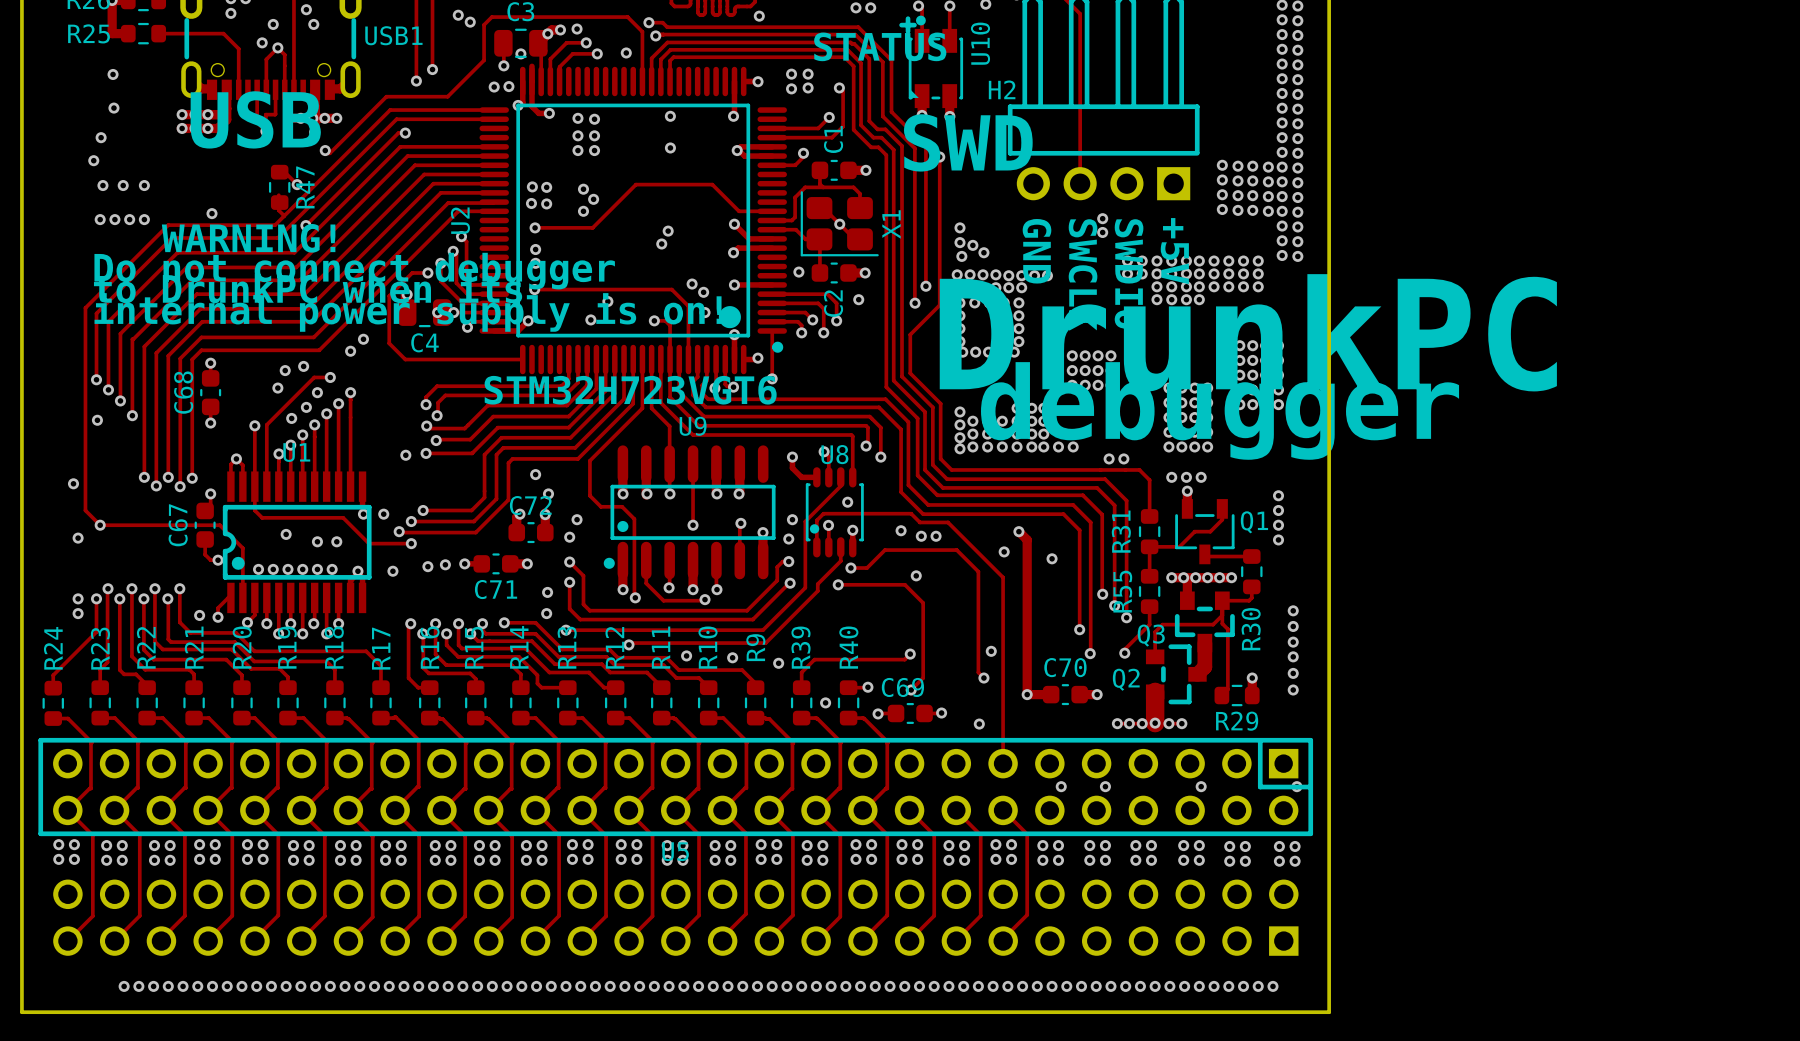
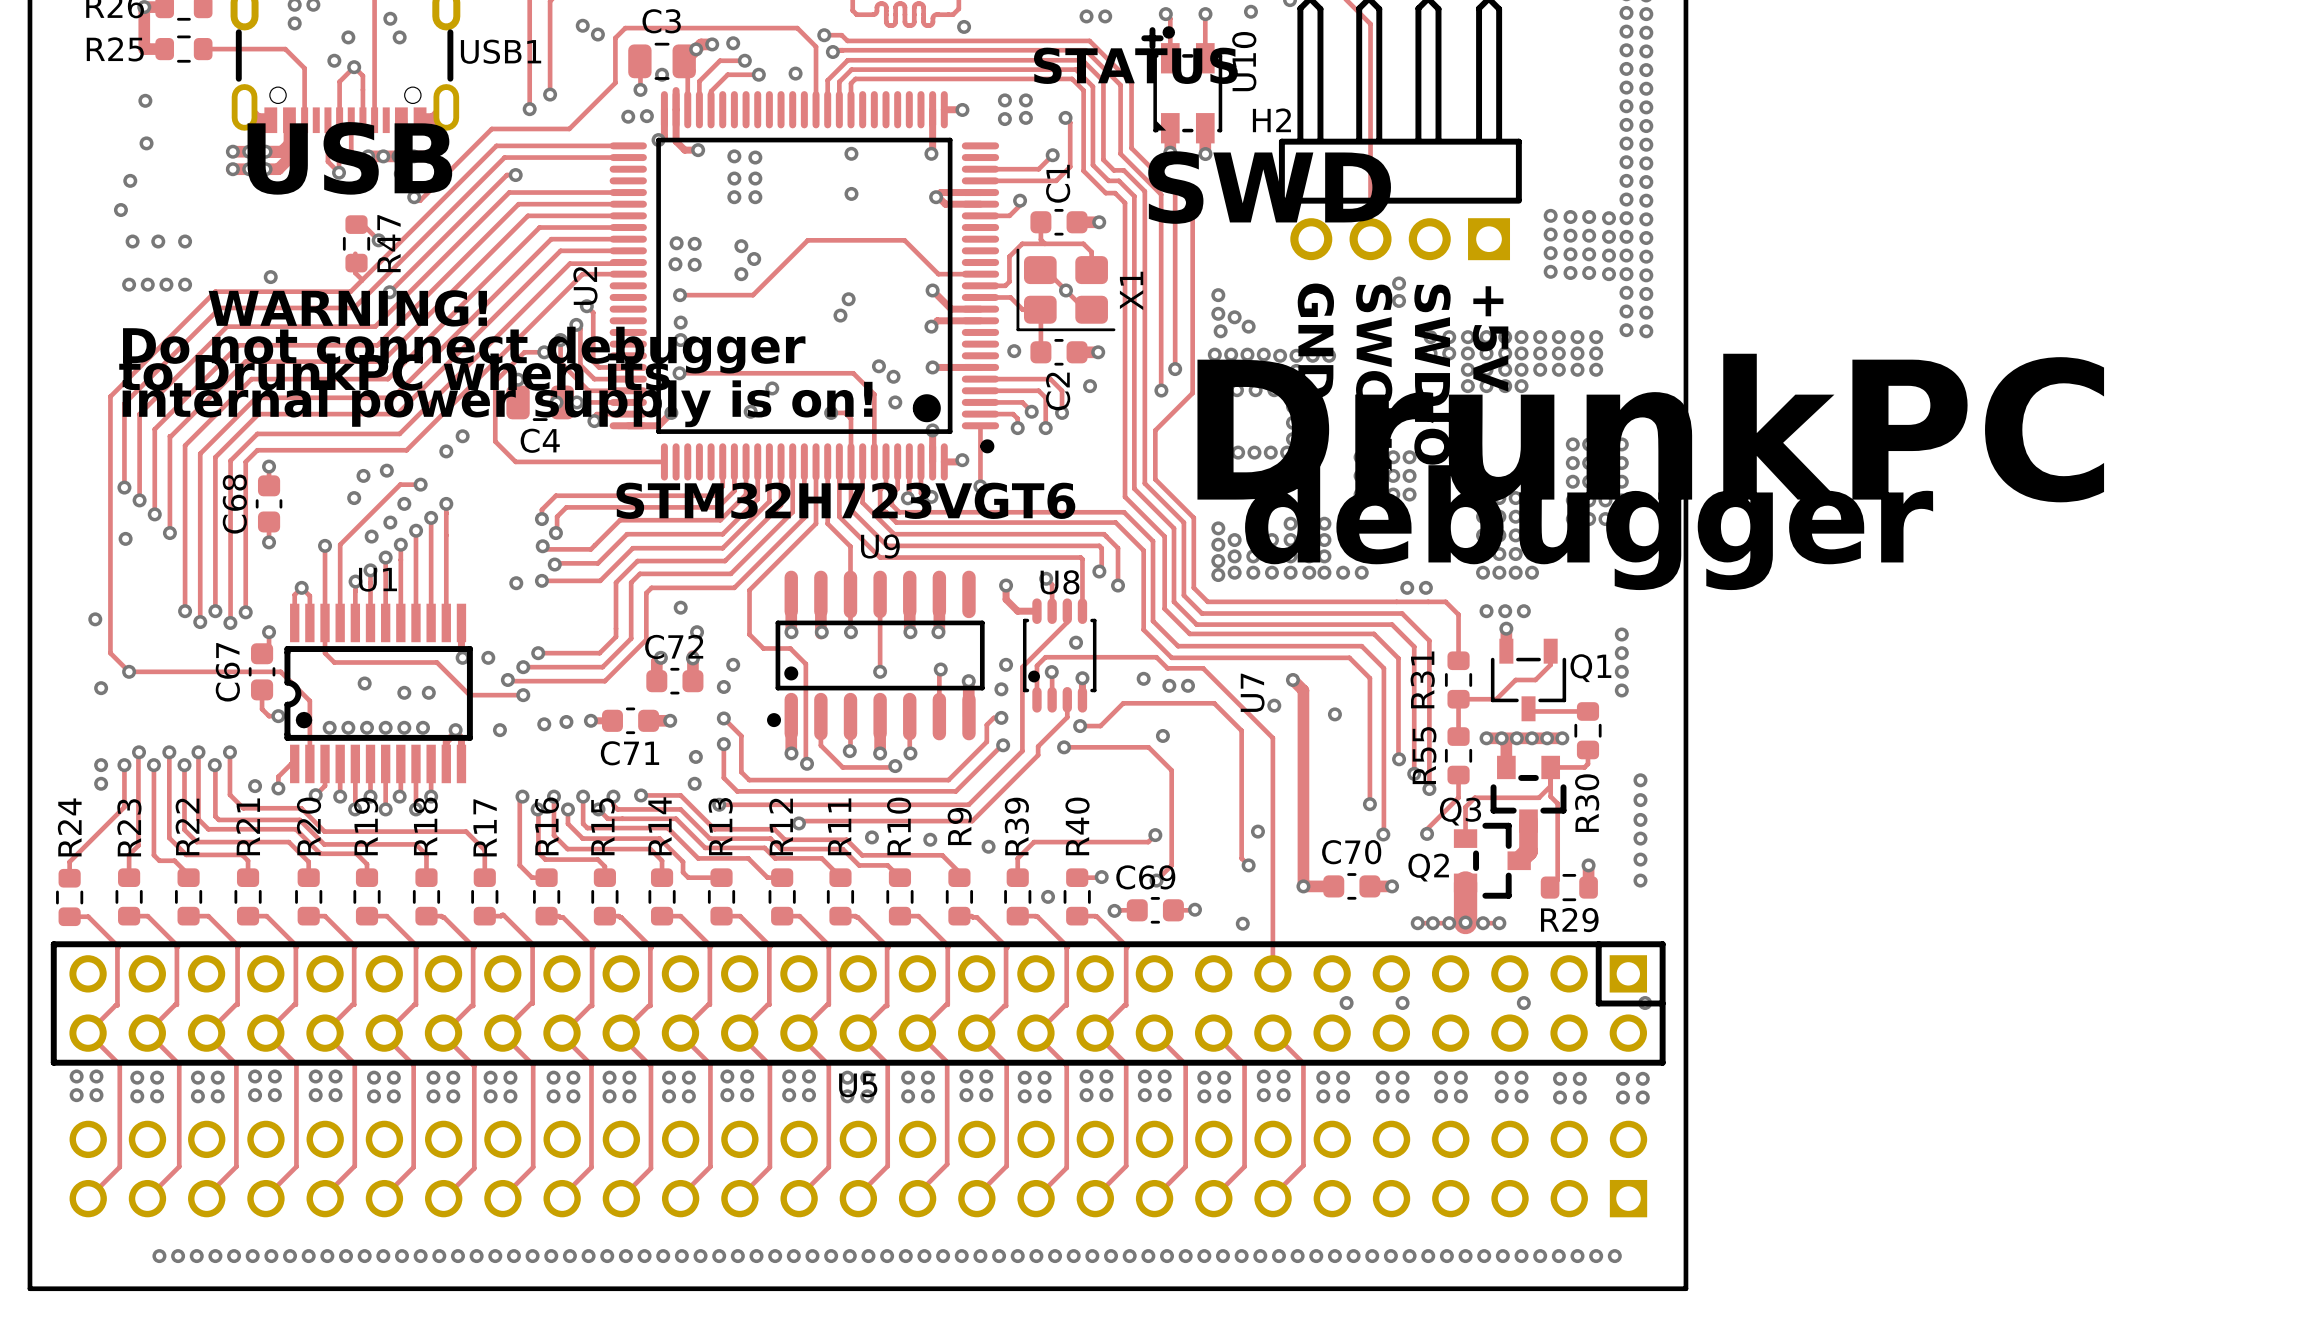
U7: none -> (1252, 692)

